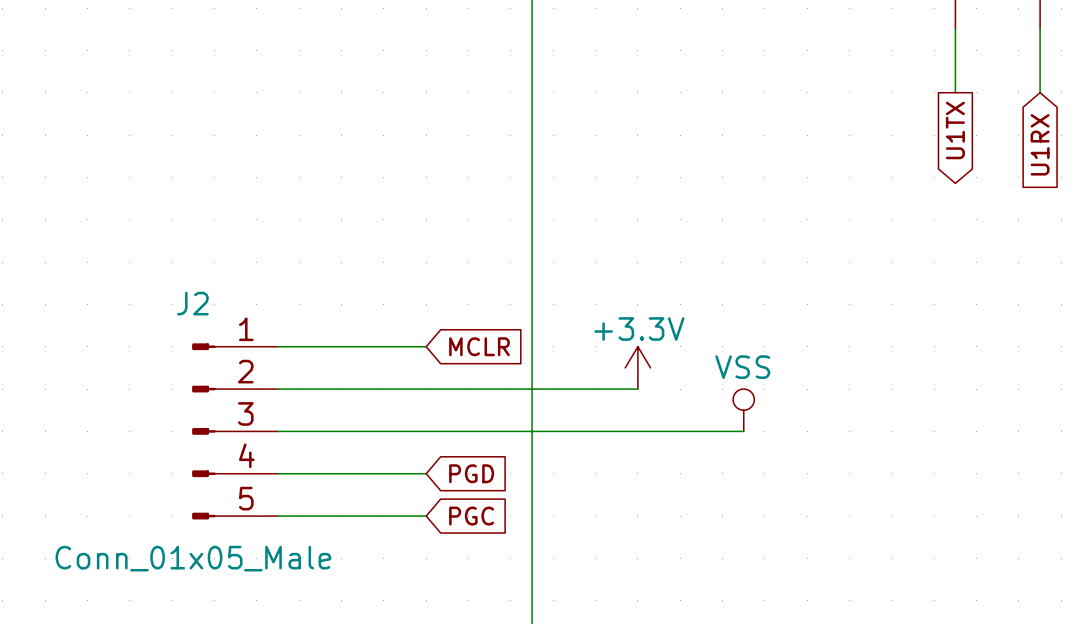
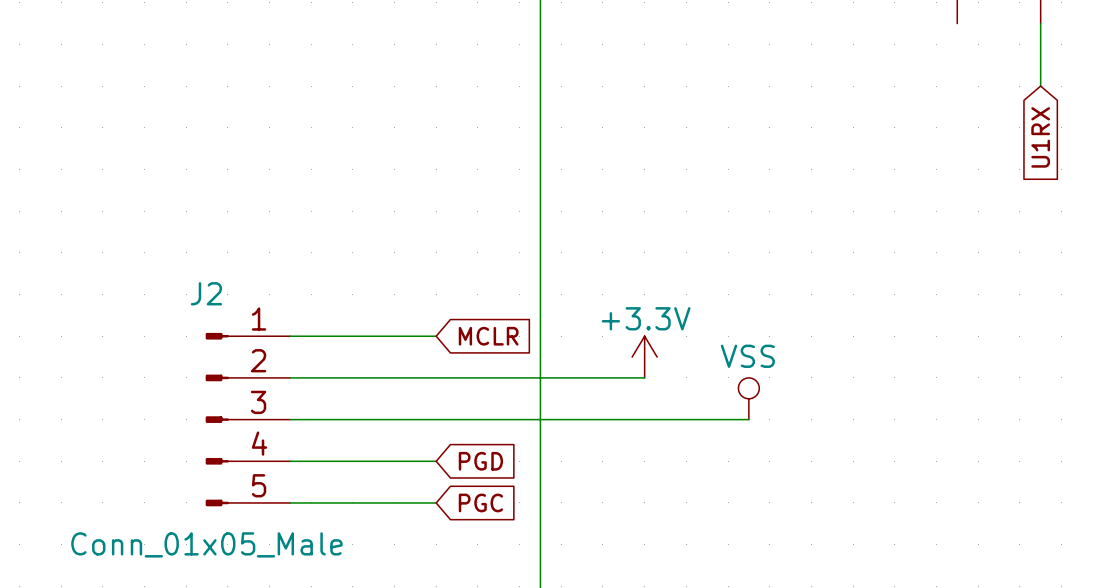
wire: (955, 29) (955, 92) -> none
global label: U1TX (955, 130) -> none

